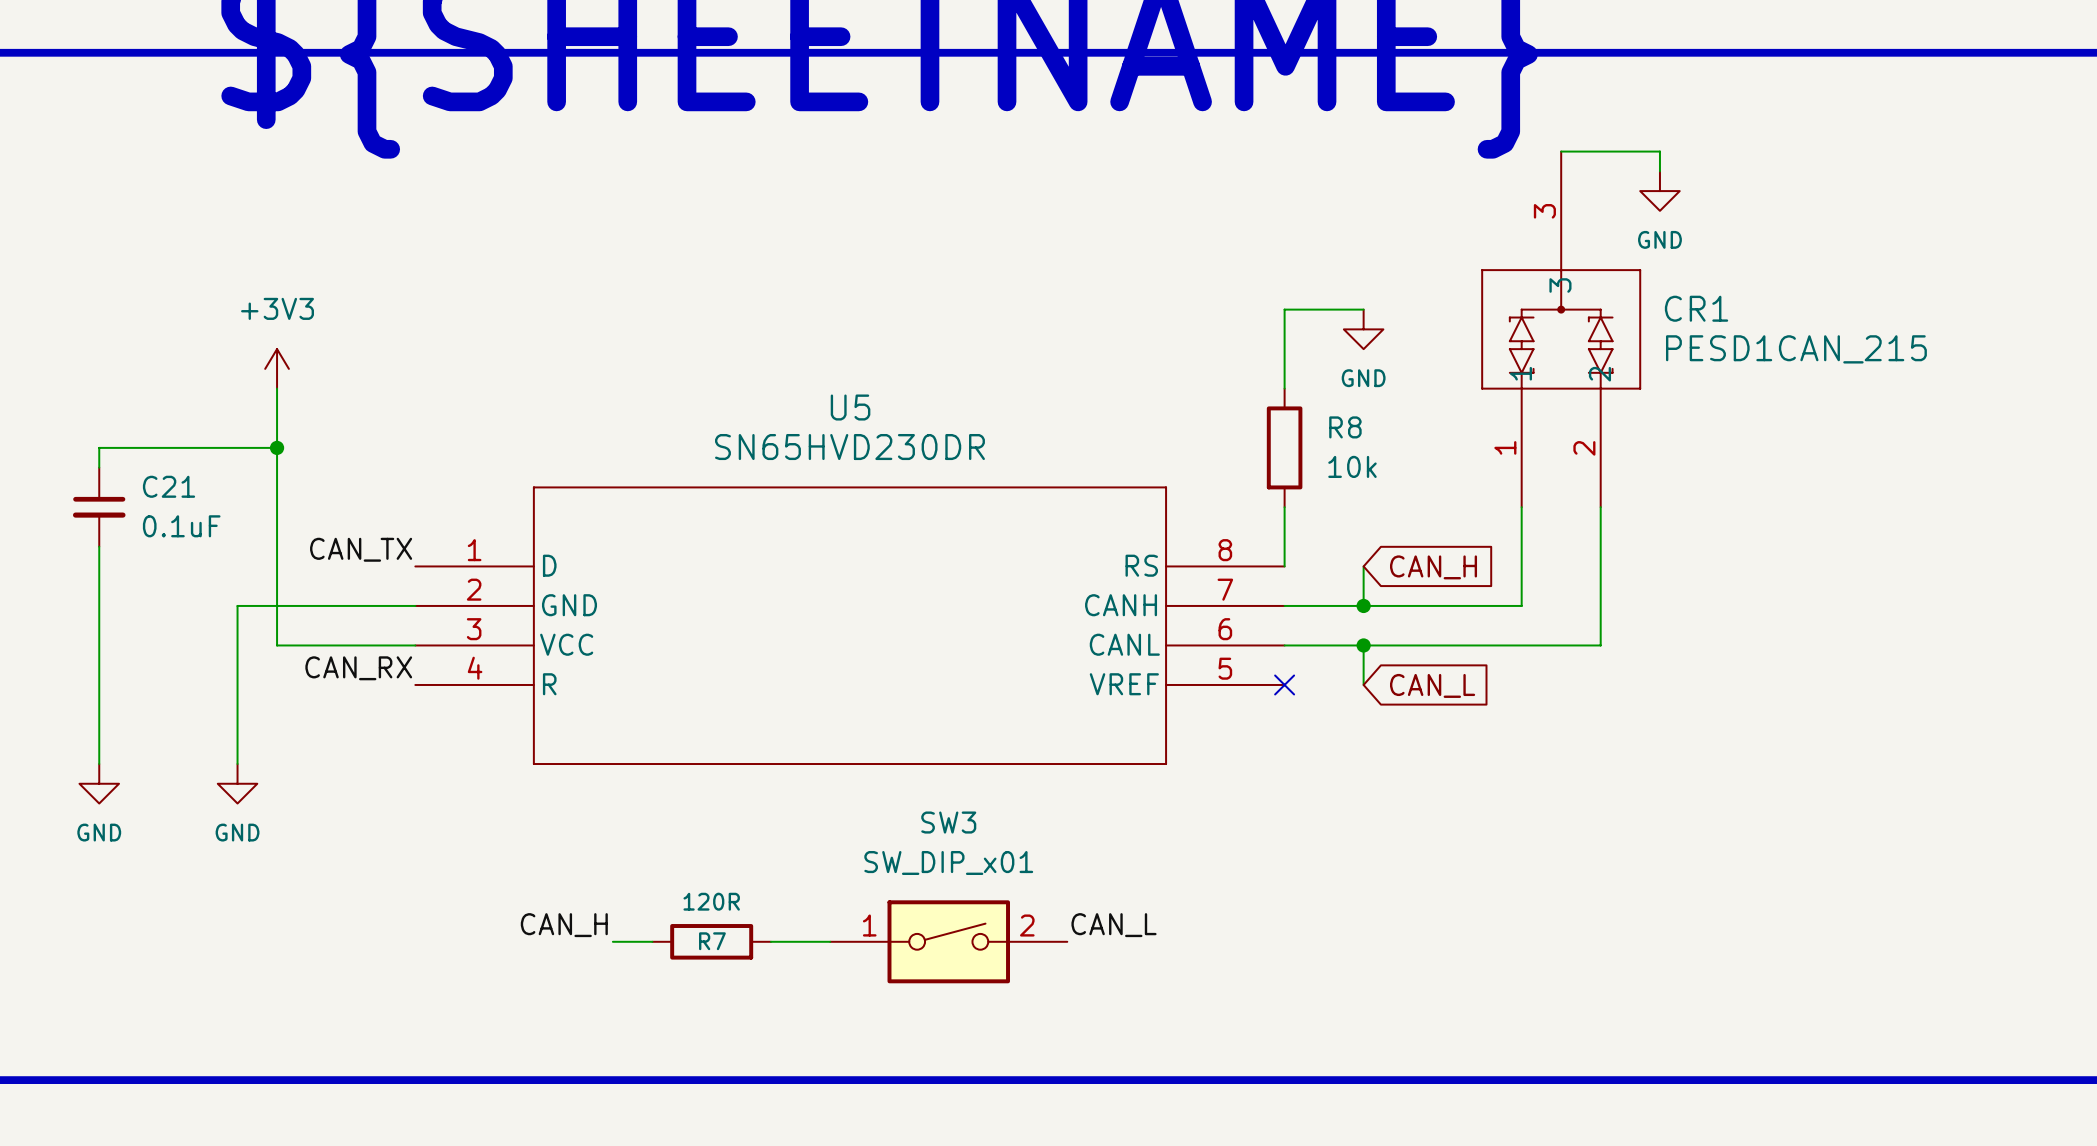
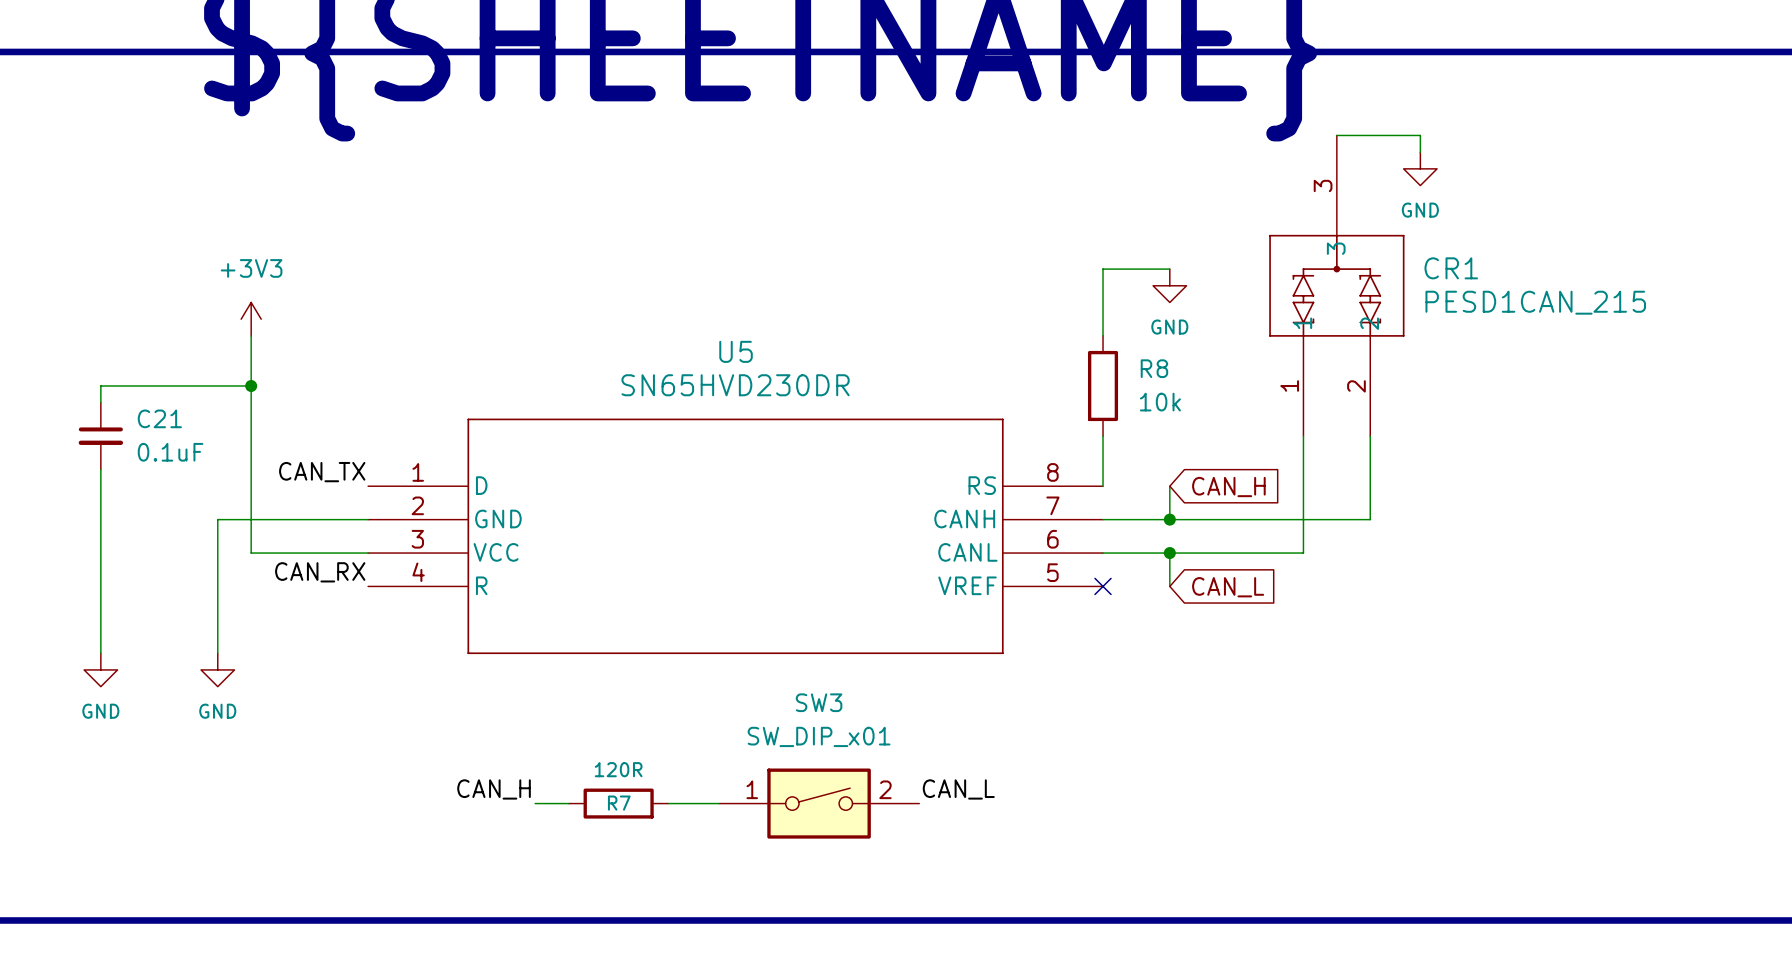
wire: (1600, 605) (1600, 645) (1521, 645) -> (1370, 519) (1303, 519) (1303, 553)

